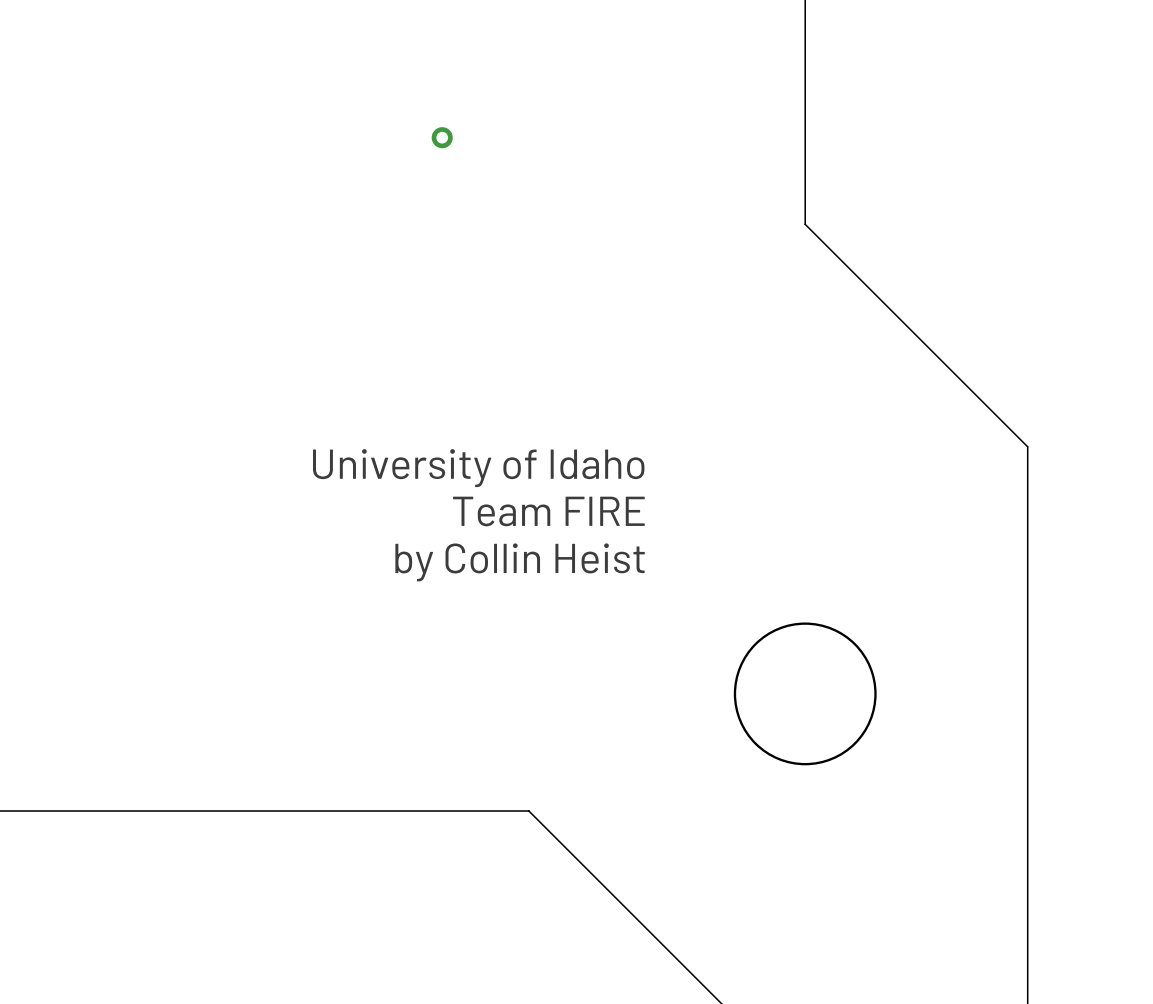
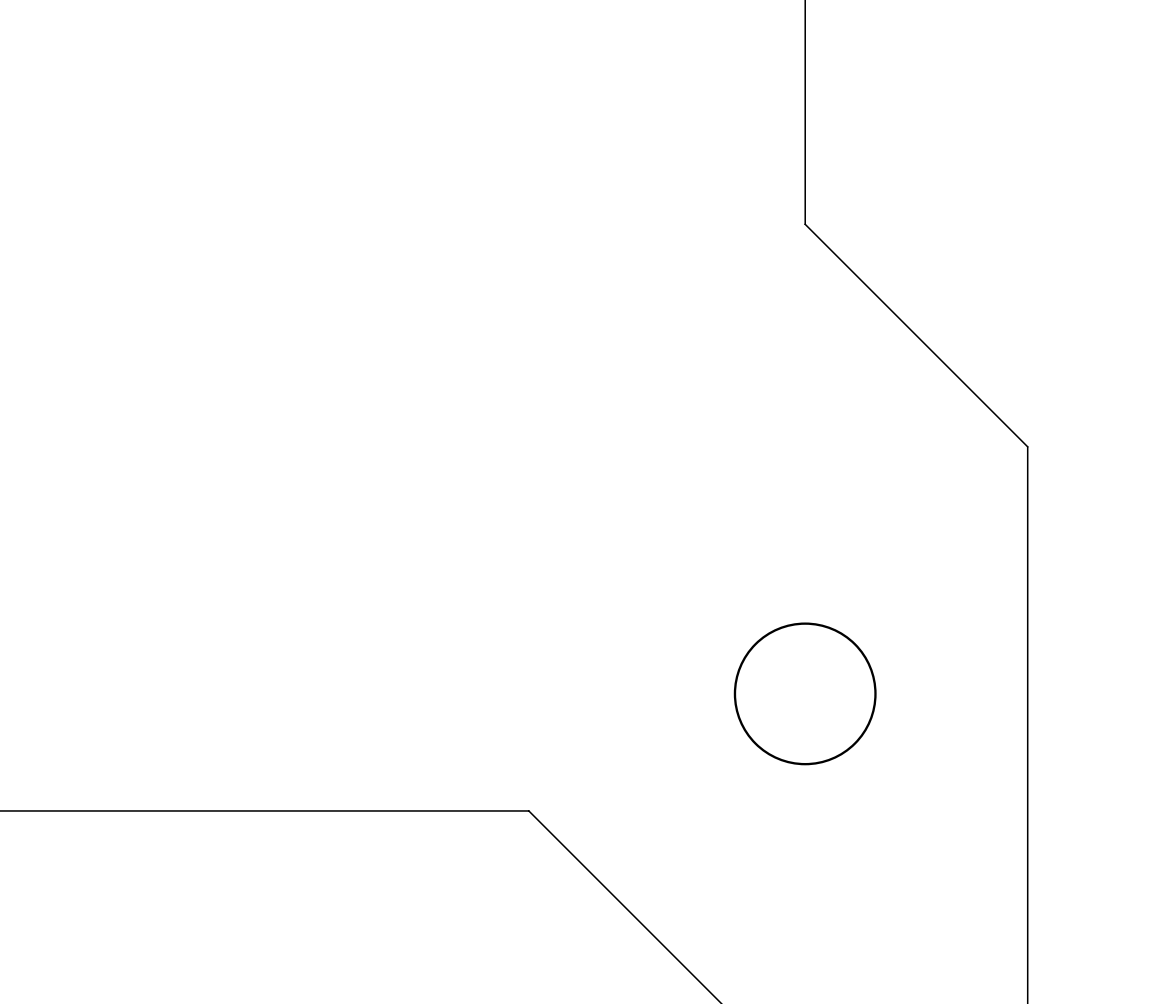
via: (442, 137) -> none
text: University of Idaho (478, 468) -> none
text: Team FIRE (548, 511) -> none
text: by Collin Heist (520, 562) -> none

